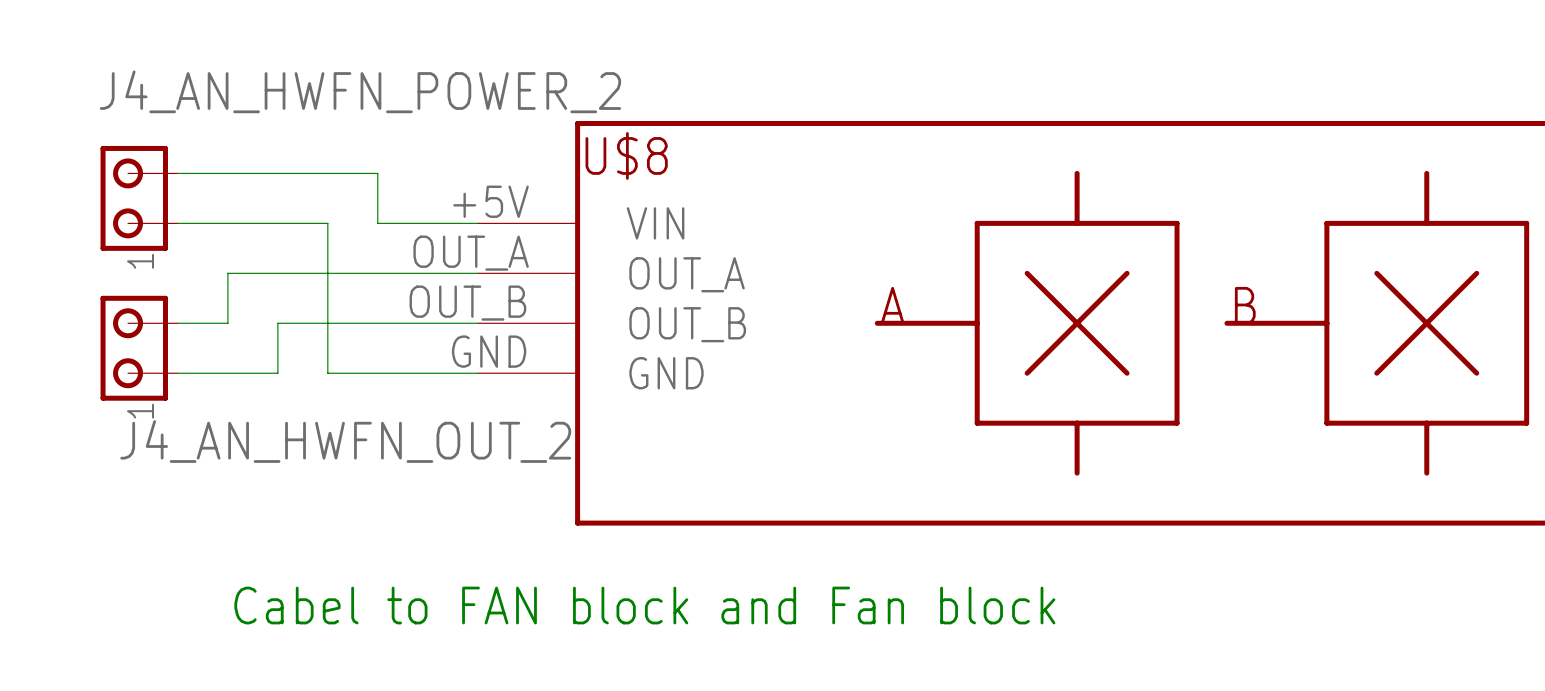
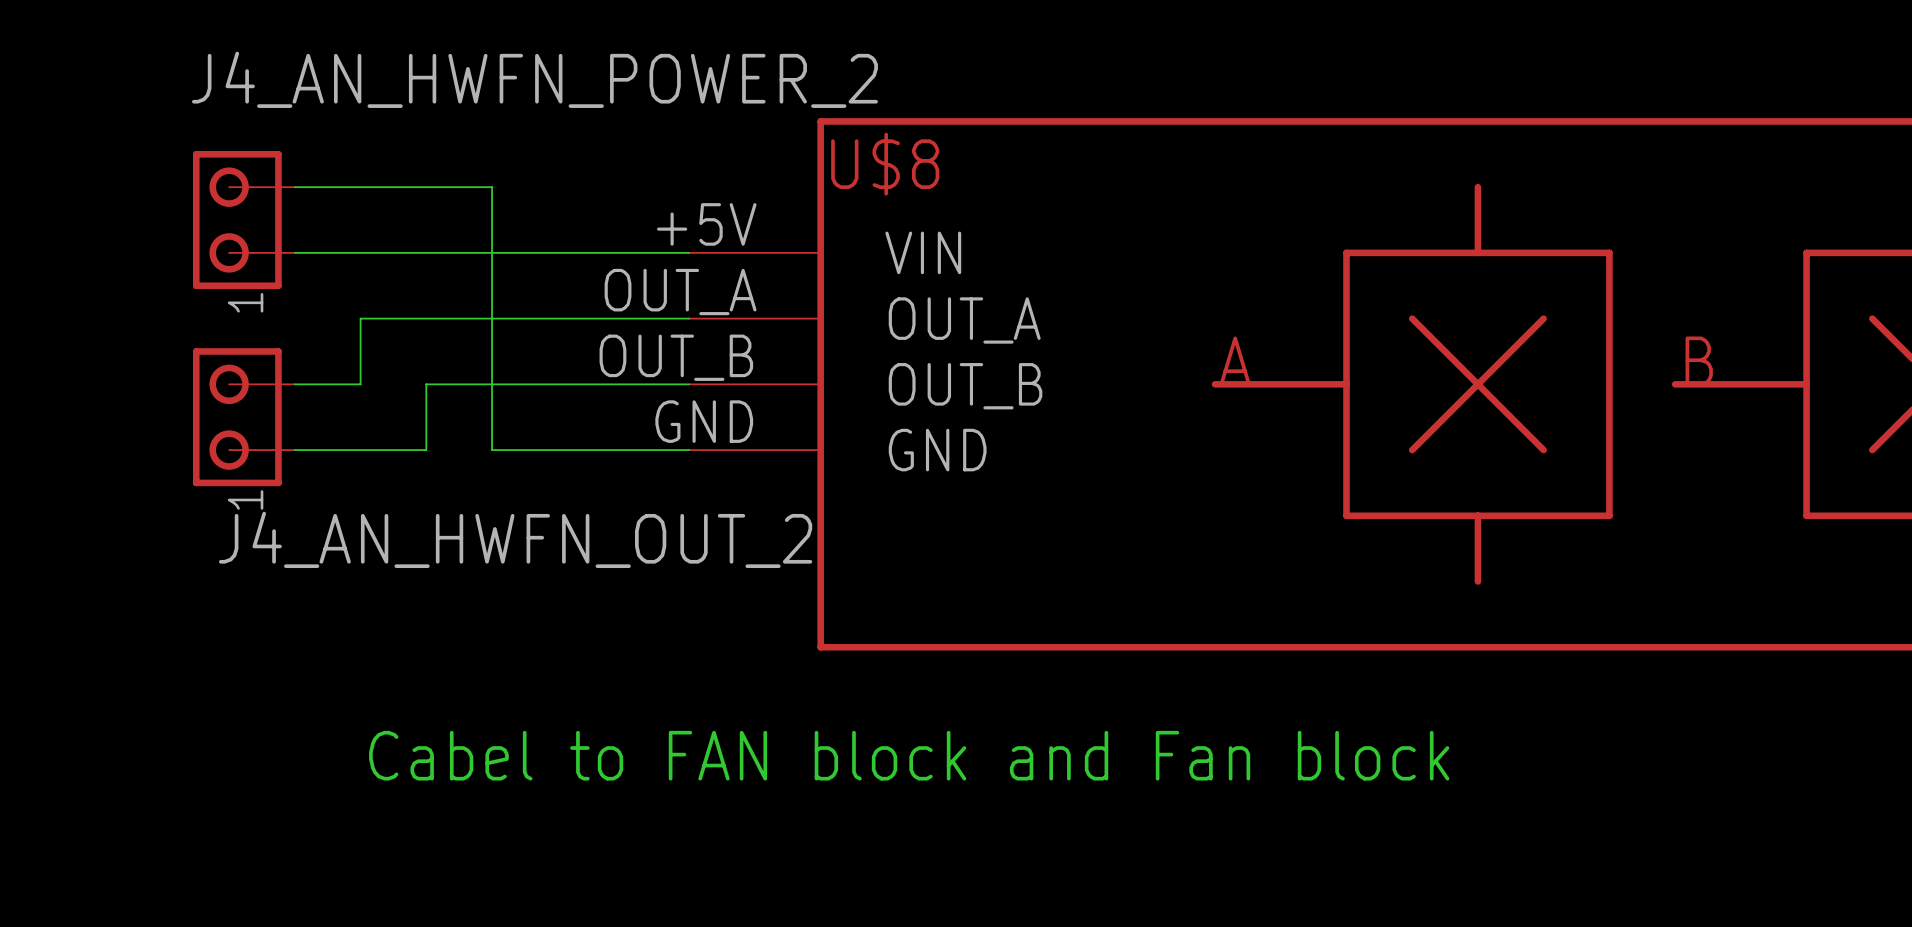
wire: (327, 173) (377, 173) (377, 223) -> (492, 187) (492, 252) (557, 252)

